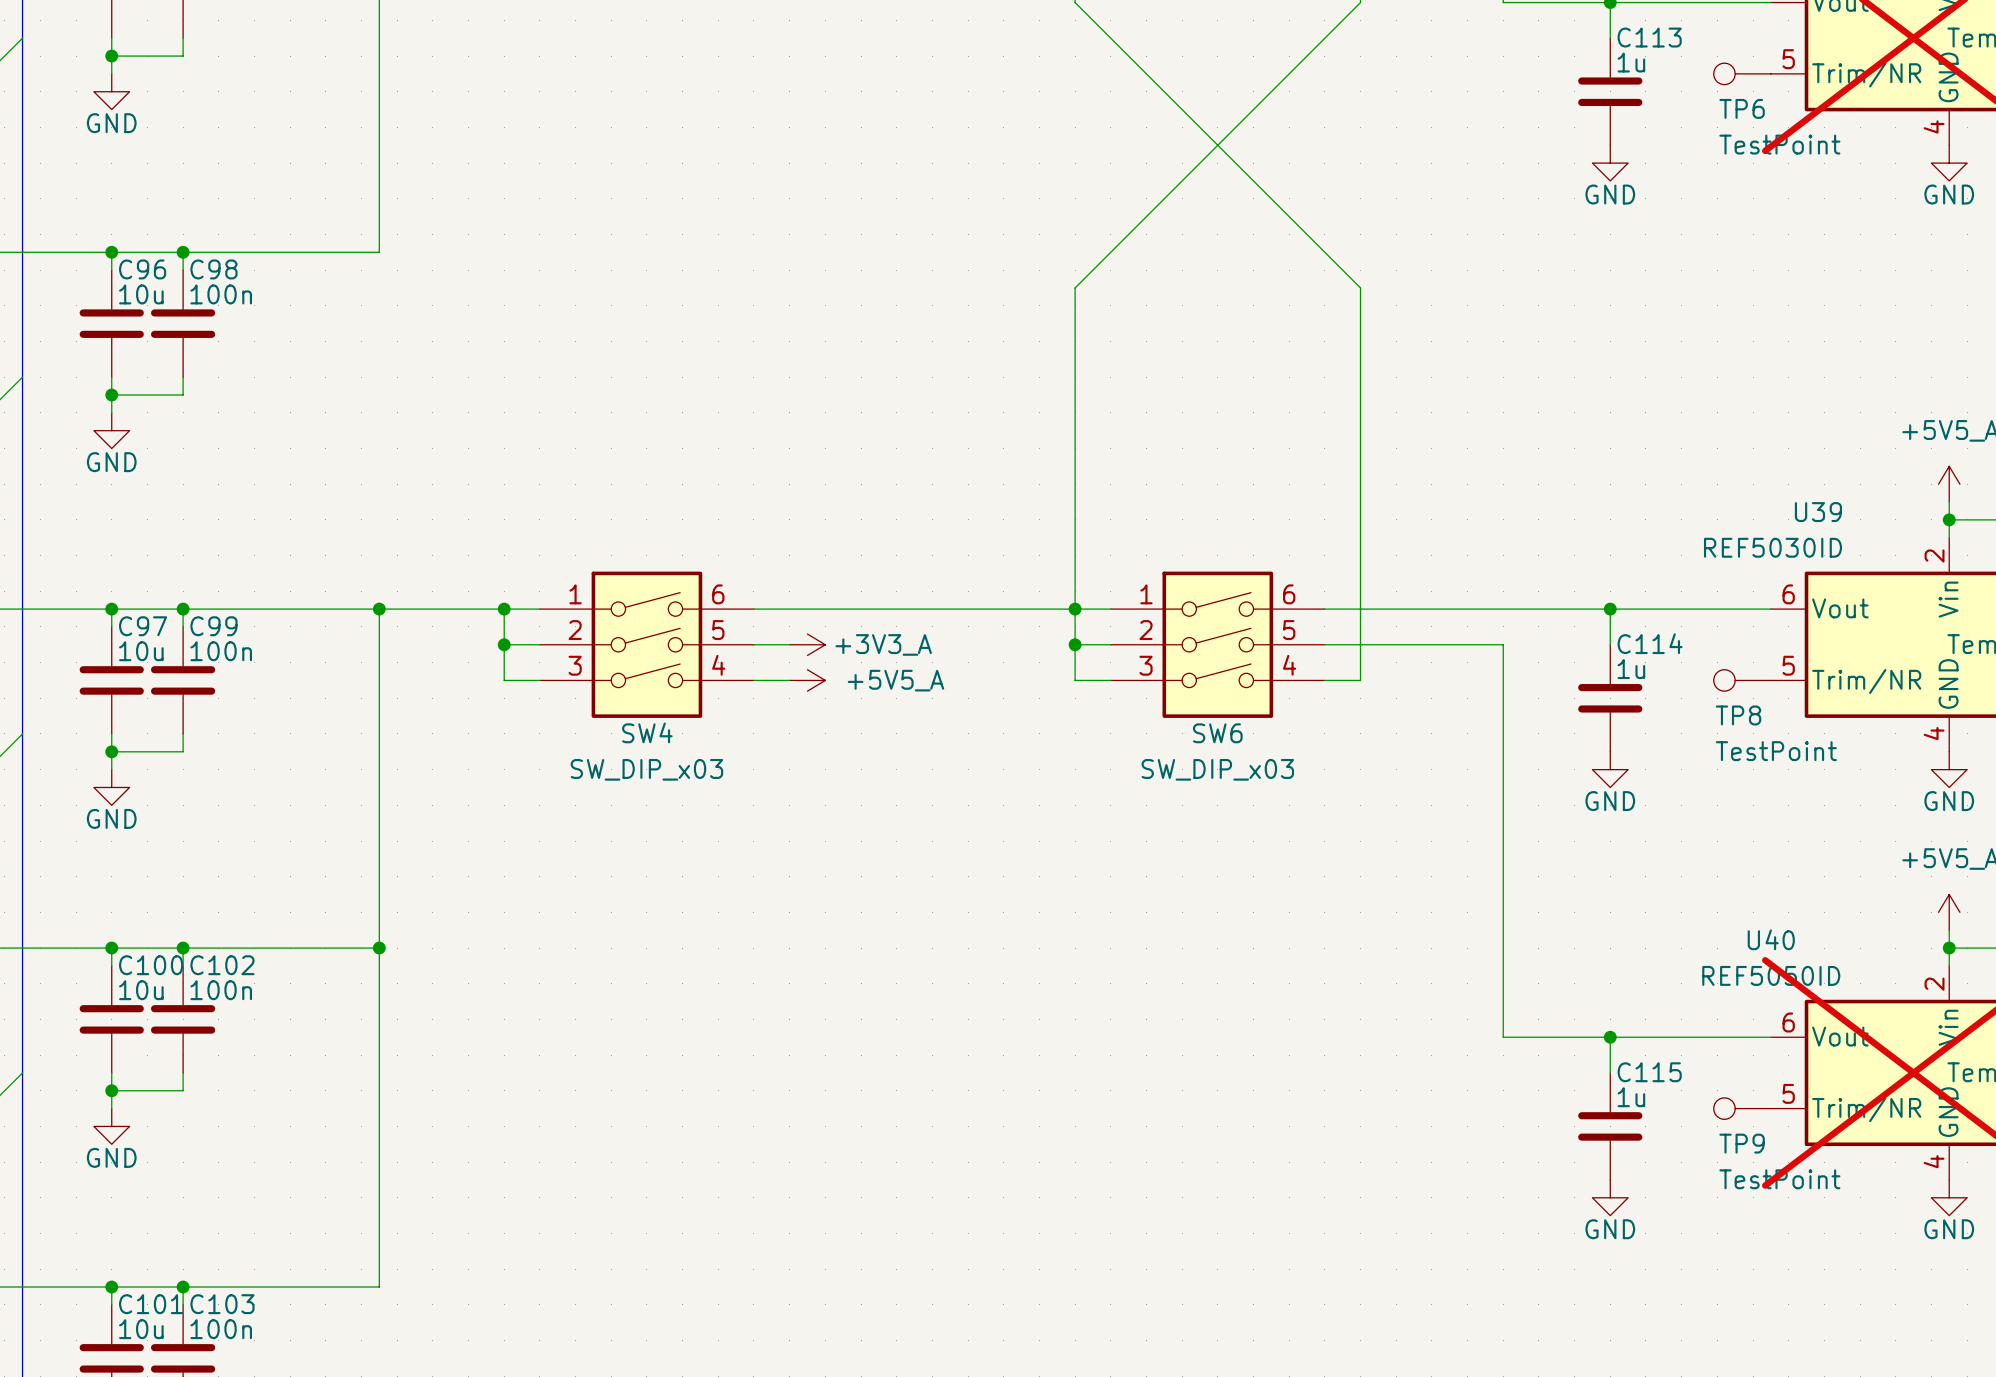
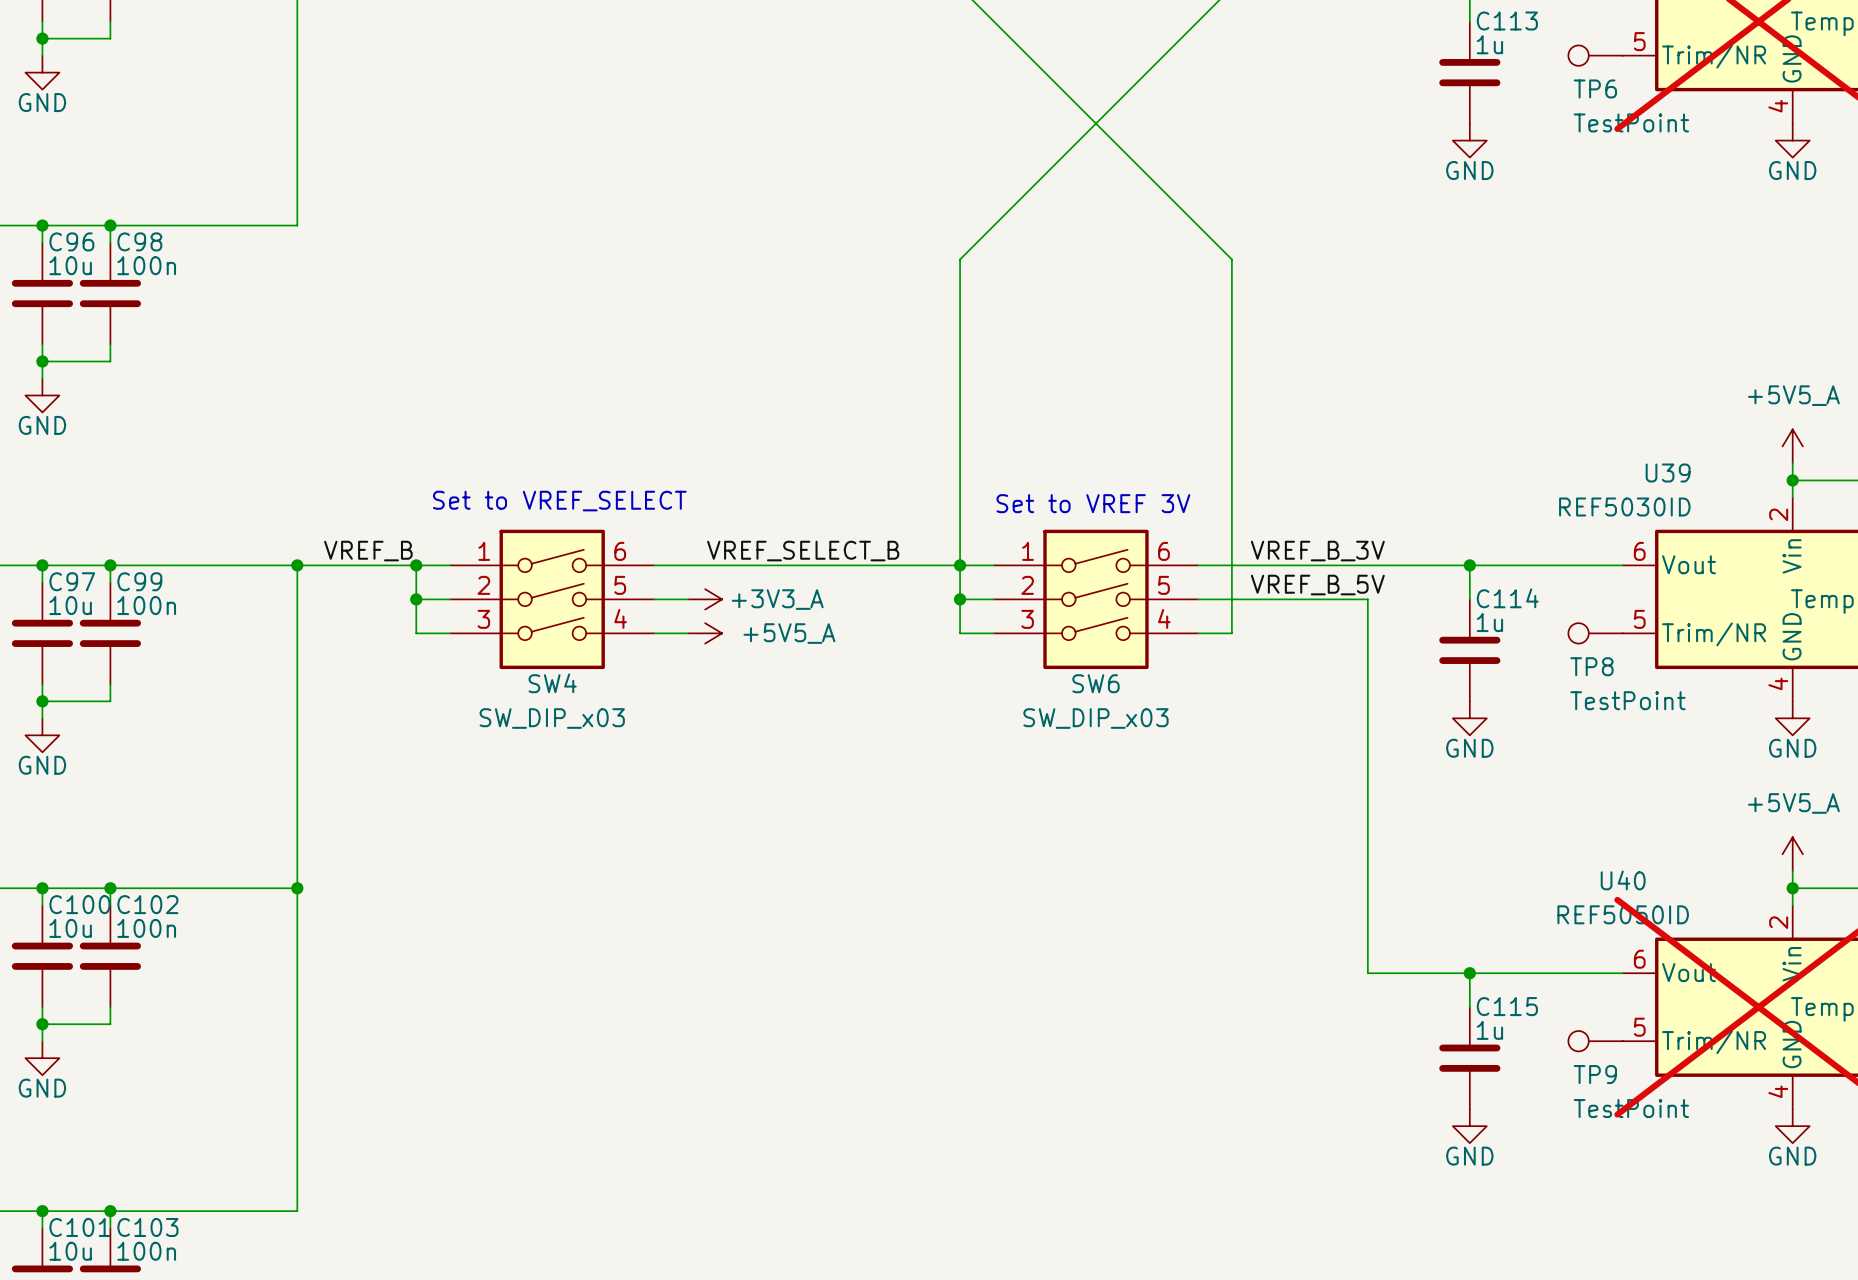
text: none -> Set to VREF_SELECT (559, 501)
text: none -> Set to VREF 3V (1093, 503)
label: none -> VREF_B (368, 551)
label: none -> VREF_SELECT_B (803, 551)
label: none -> VREF_B_3V (1317, 551)
label: none -> VREF_B_5V (1317, 585)

